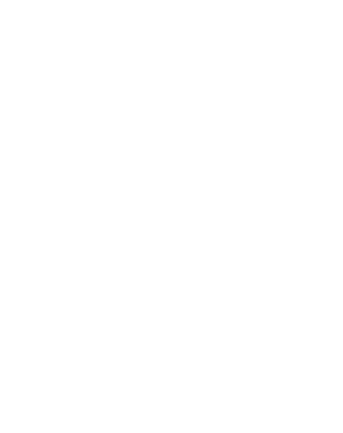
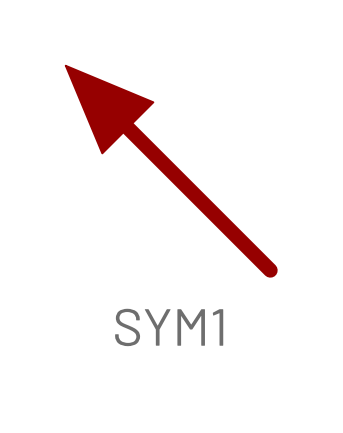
SYM1: none -> (171, 171)

